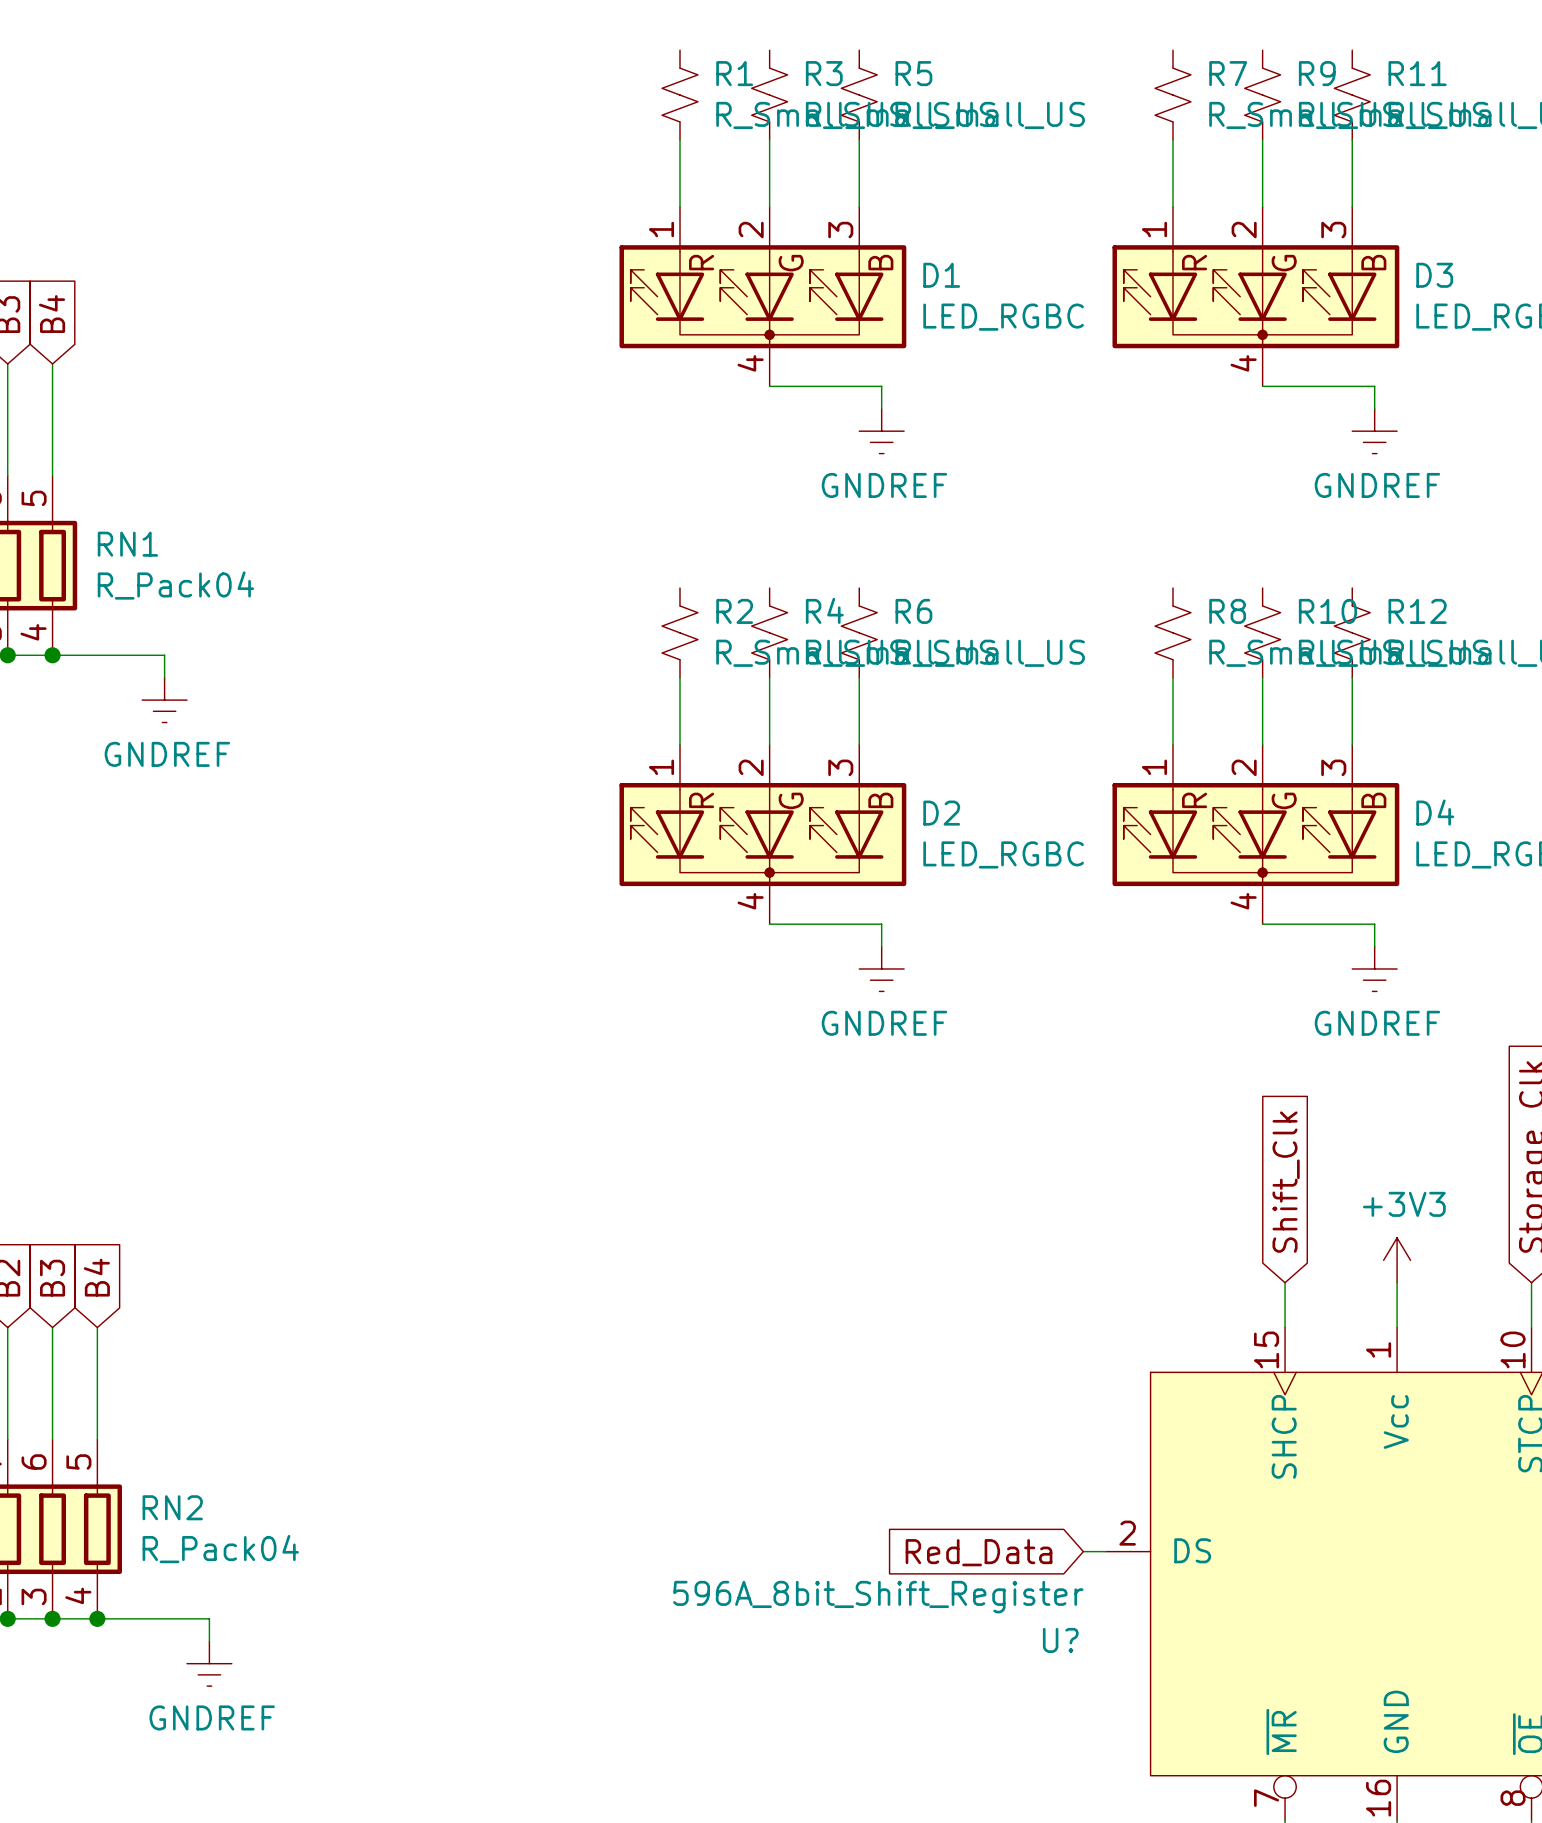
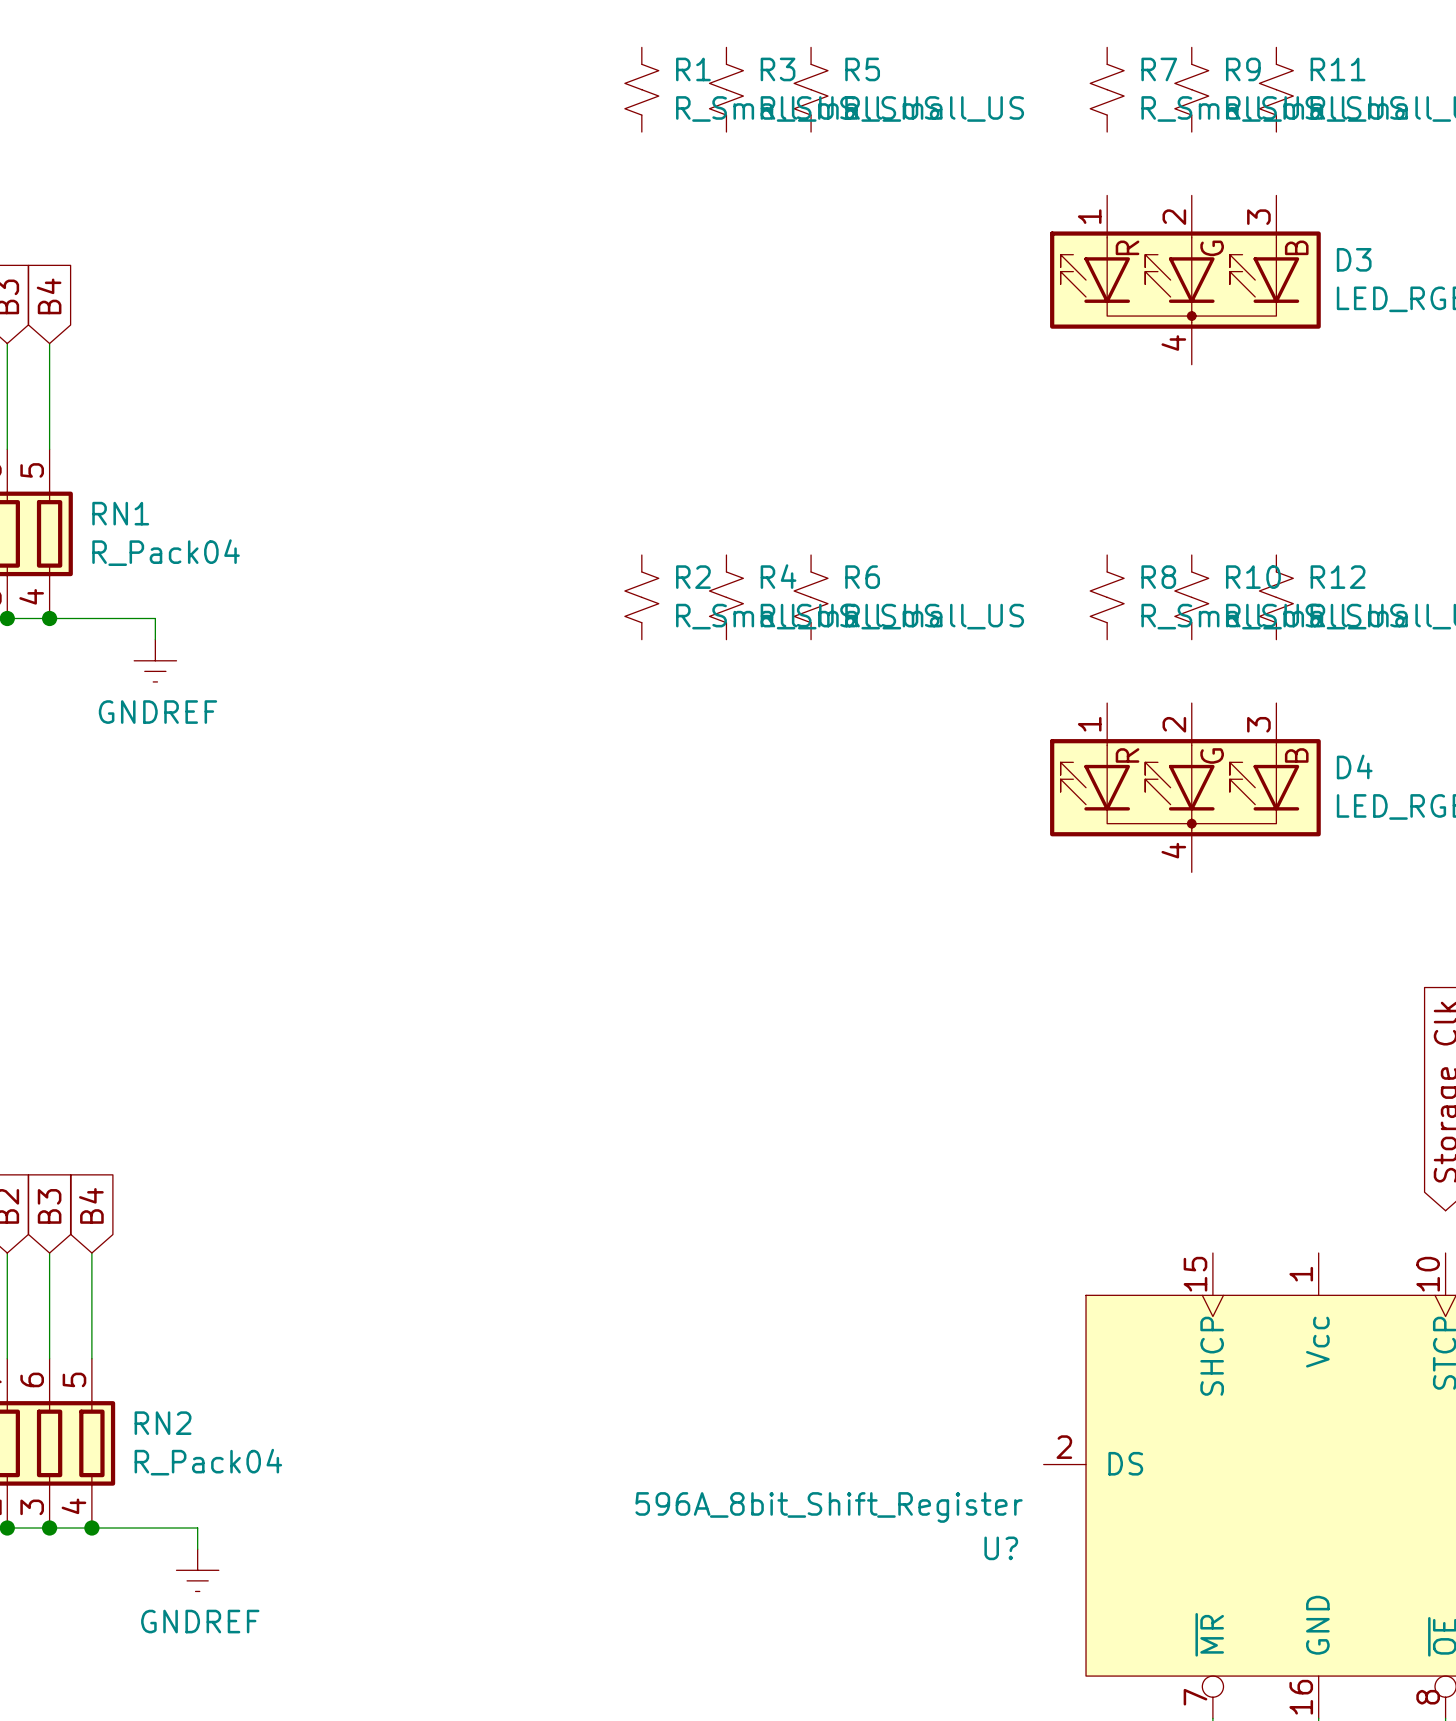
wire: (679, 139) (679, 207) -> none
wire: (769, 139) (769, 207) -> none
wire: (859, 139) (859, 207) -> none
wire: (1172, 139) (1172, 207) -> none
wire: (1262, 139) (1262, 207) -> none
wire: (1352, 139) (1352, 207) -> none
D1: LED_RGBC (762, 296) -> none
wire: (769, 386) (881, 386) (881, 408) -> none
wire: (1262, 386) (1374, 386) (1374, 408) -> none
power symbol: GNDREF (881, 431) -> none
power symbol: GNDREF (1374, 431) -> none
wire: (679, 677) (679, 744) -> none
wire: (769, 677) (769, 744) -> none
wire: (859, 677) (859, 744) -> none
wire: (1172, 677) (1172, 744) -> none
wire: (1262, 677) (1262, 744) -> none
wire: (1352, 677) (1352, 744) -> none
D2: LED_RGBC (762, 834) -> none
wire: (769, 924) (881, 924) (881, 946) -> none
wire: (1262, 924) (1374, 924) (1374, 946) -> none
power symbol: GNDREF (881, 968) -> none
power symbol: GNDREF (1374, 968) -> none
global label: Shift_Clk (1286, 1182) -> none
power symbol: +3V3 (1397, 1260) -> none
wire: (1285, 1282) (1285, 1327) -> none
wire: (1397, 1282) (1397, 1327) -> none
wire: (1531, 1282) (1531, 1327) -> none
wire: (1083, 1551) (1105, 1551) -> none
global label: Red_Data (979, 1552) -> none

